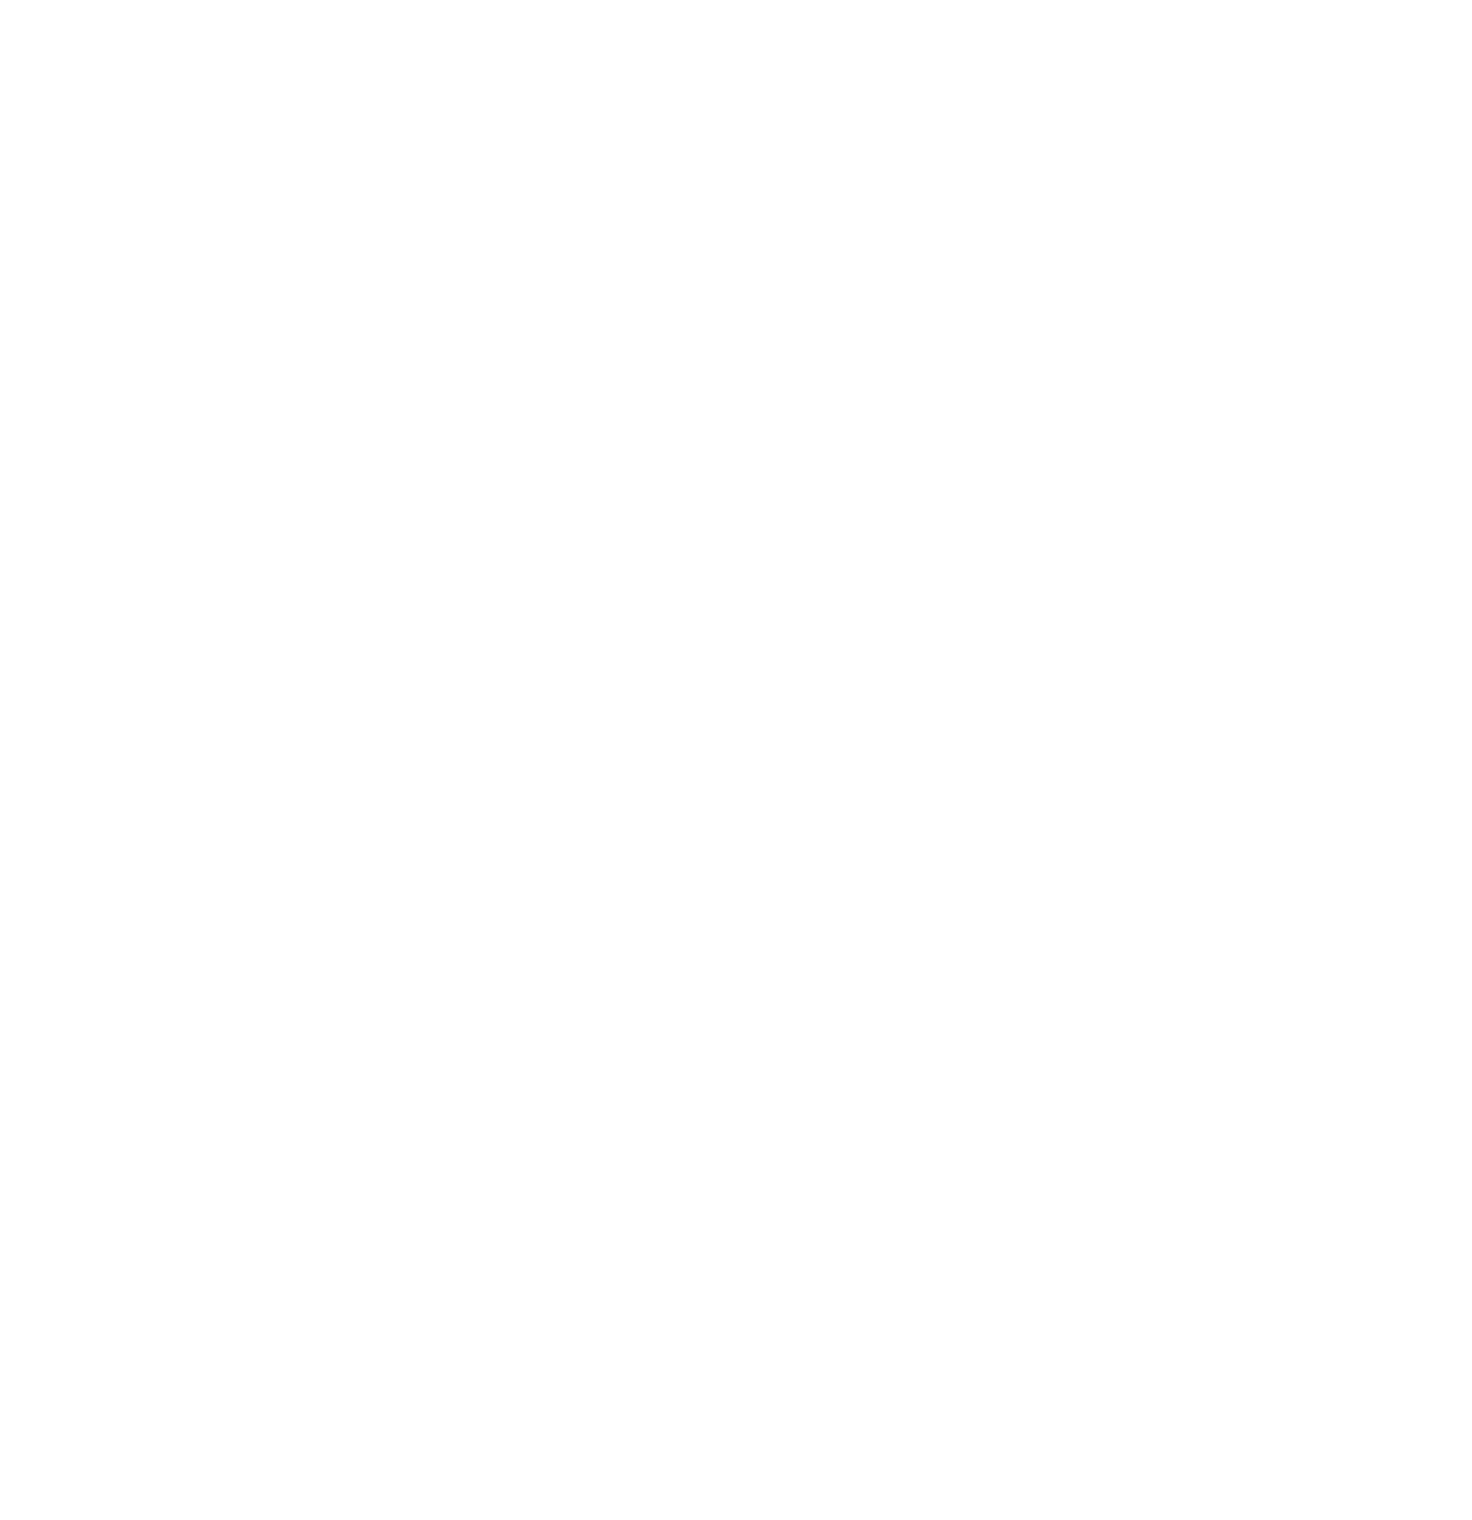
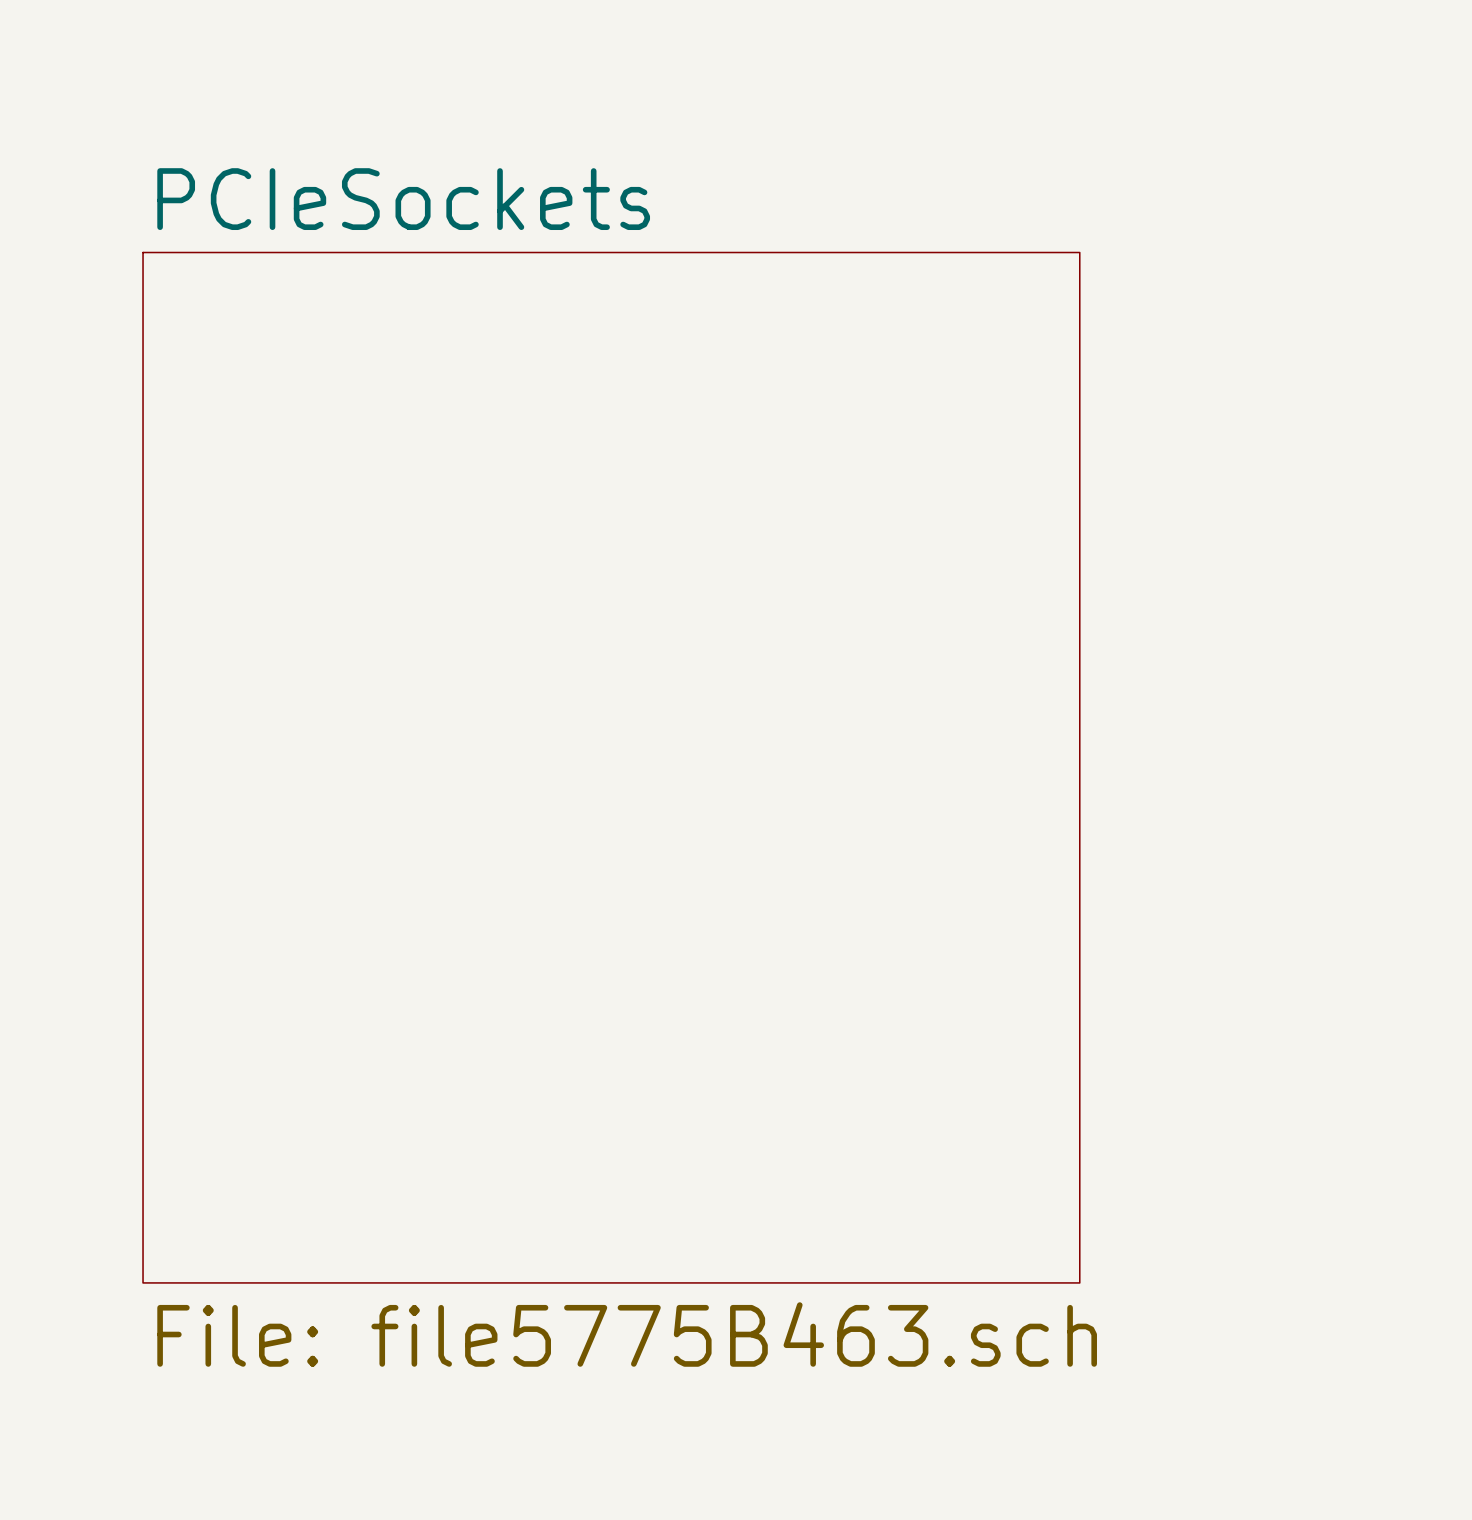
sheet PCIeSockets: none -> File: file5775B463.sch (611, 767)

